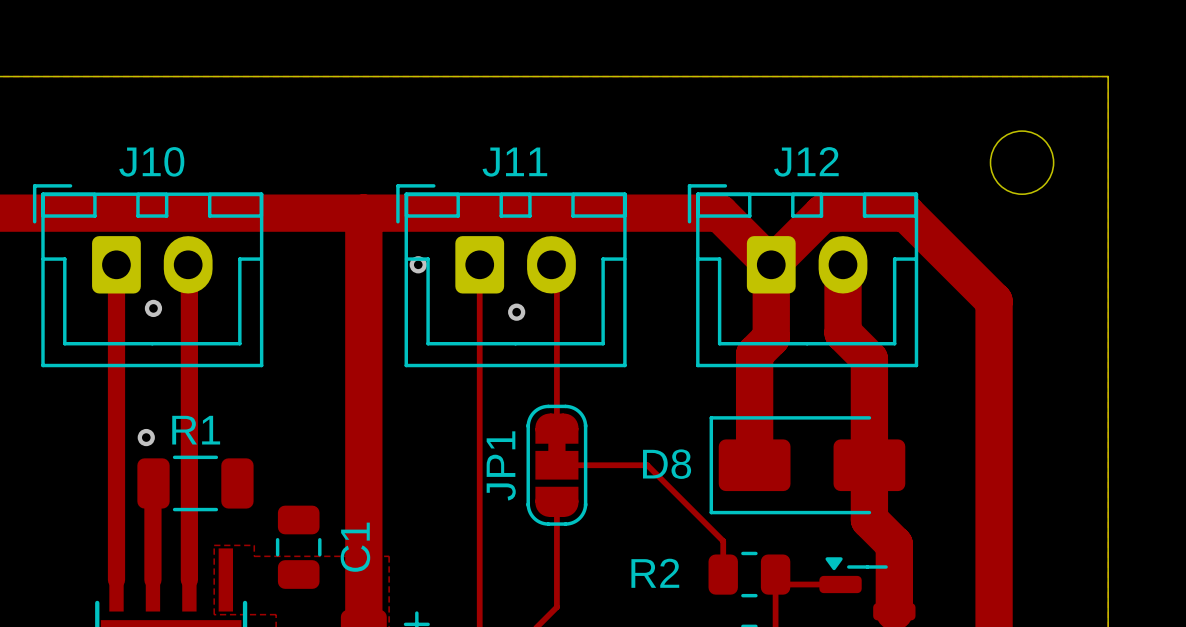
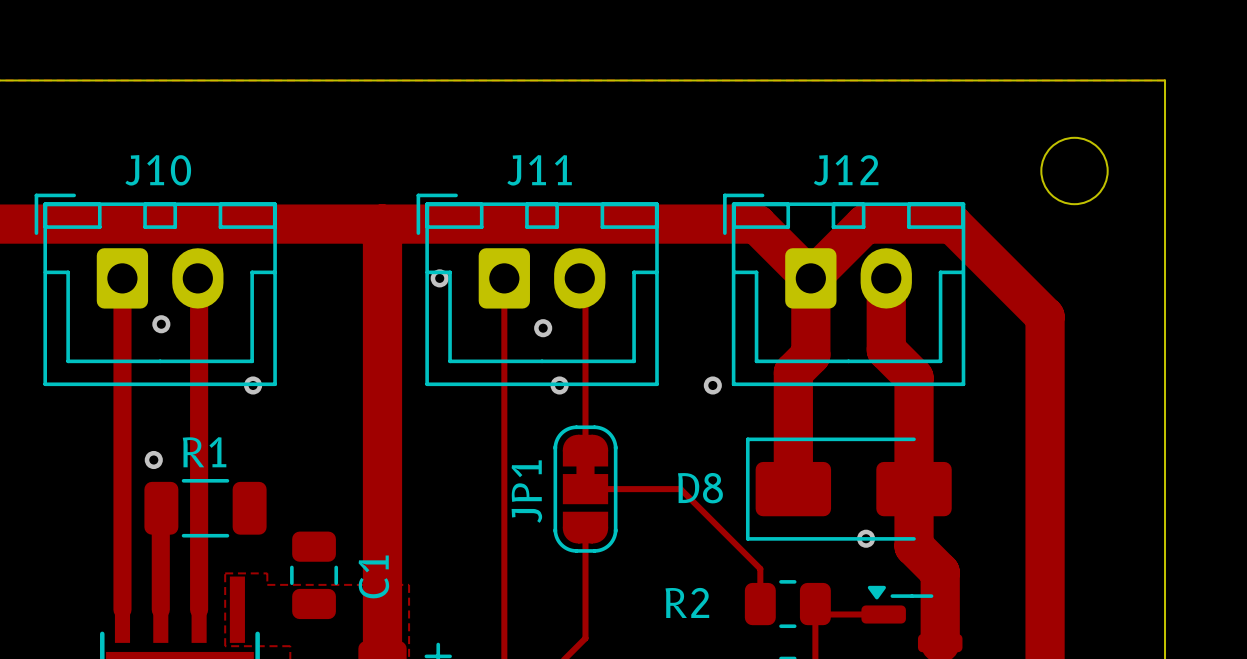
via: none -> (253, 385)
via: none -> (559, 385)
via: none -> (712, 385)
via: none -> (866, 538)

